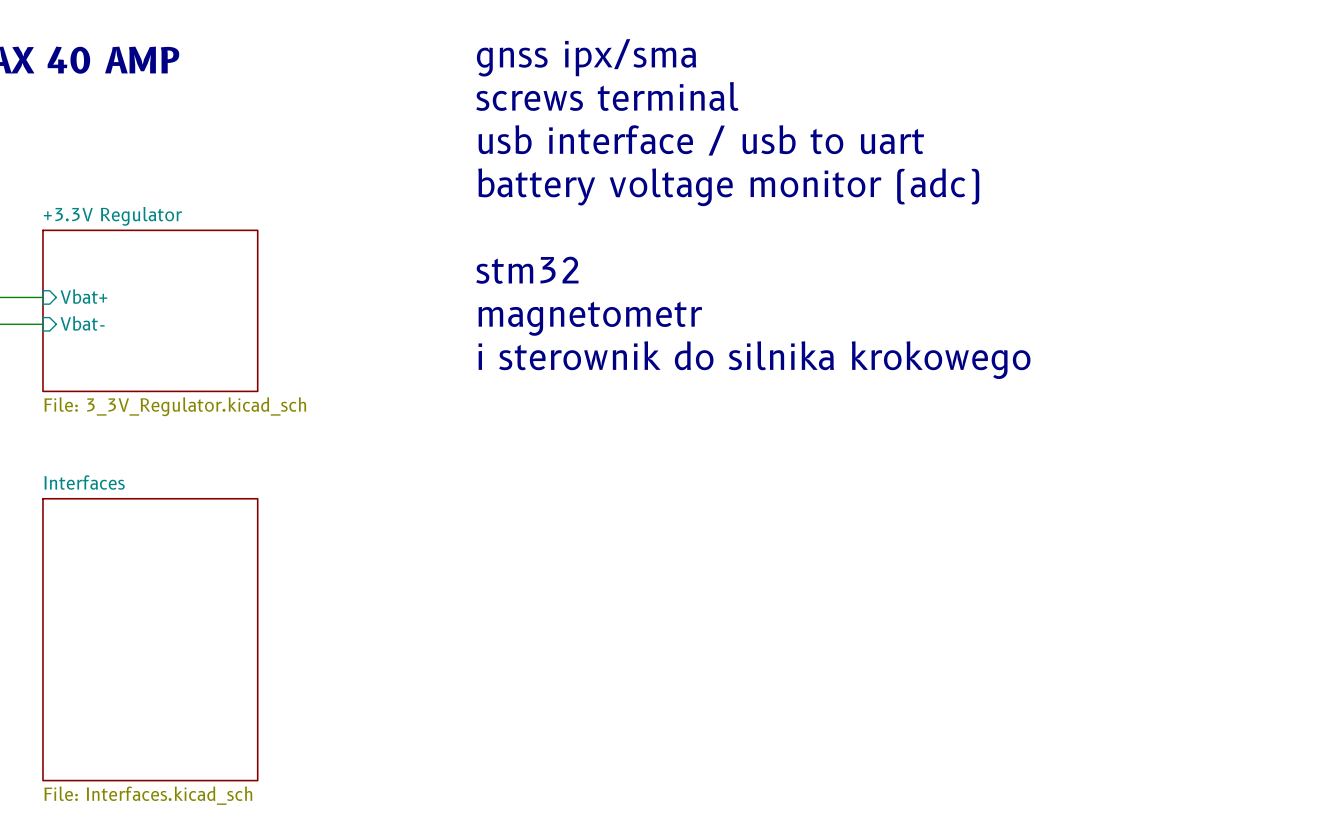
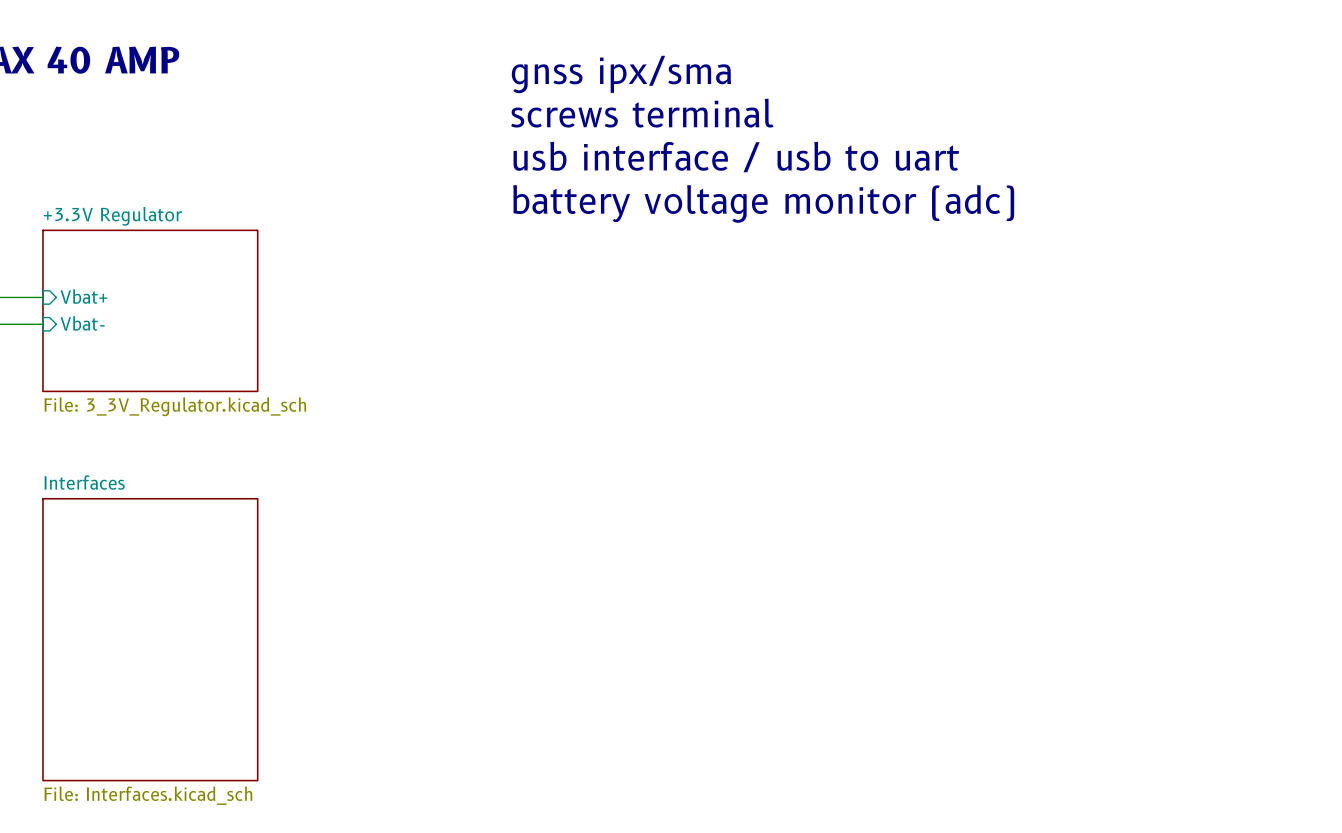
text position: gnss ipx/sma (586, 57) -> gnss ipx/sma (621, 74)
text position: screws terminal (607, 96) -> screws terminal (642, 113)
text position: usb interface / usb to uart (701, 140) -> usb interface / usb to uart (736, 157)
text position: battery voltage monitor (adc) (728, 187) -> battery voltage monitor (adc) (763, 203)
text: stm32 (527, 270) -> none
text: magnetometr (590, 318) -> none
text: i sterownik do silnika krokowego (754, 360) -> none

